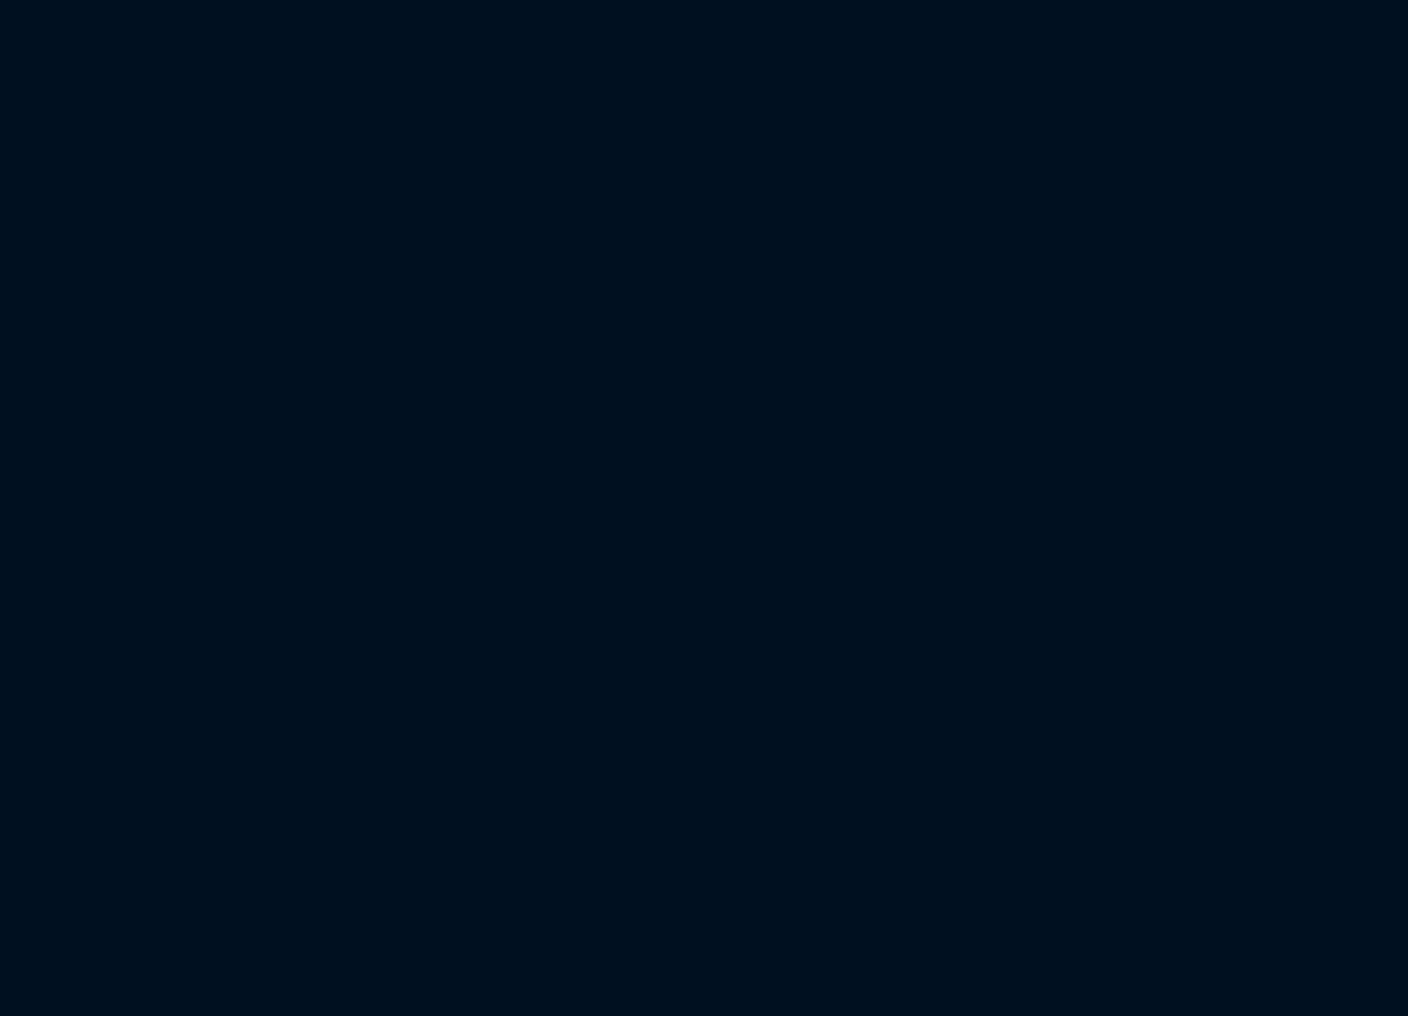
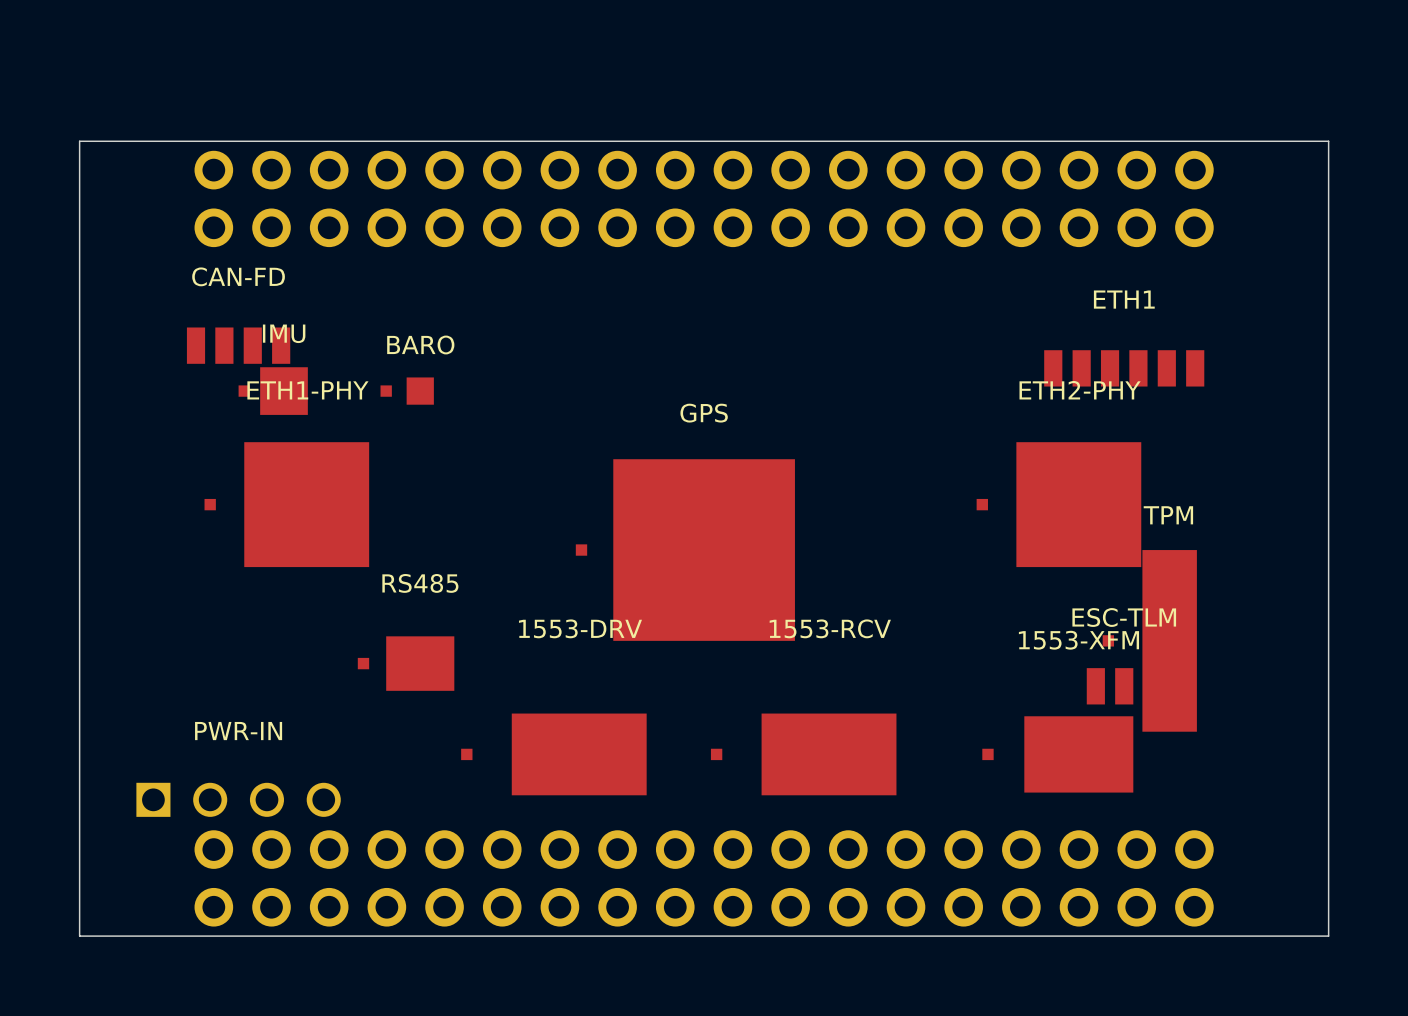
board edge: none -> (79, 141) (1328, 141) (1328, 936) (79, 936) (79, 141)
part: none -> (704, 198)
CAN-FD: none -> (238, 345)
ETH1: none -> (1124, 368)
IMU: none -> (273, 391)
BARO: none -> (407, 391)
ETH1-PHY: none -> (286, 504)
ETH2-PHY: none -> (1058, 504)
GPS: none -> (685, 550)
TPM: none -> (1149, 640)
RS485: none -> (406, 663)
ESC-TLM: none -> (1124, 686)
1553-DRV: none -> (553, 754)
1553-RCV: none -> (803, 754)
1553-XFM: none -> (1057, 754)
PWR-IN: none -> (238, 799)
part: none -> (704, 878)

